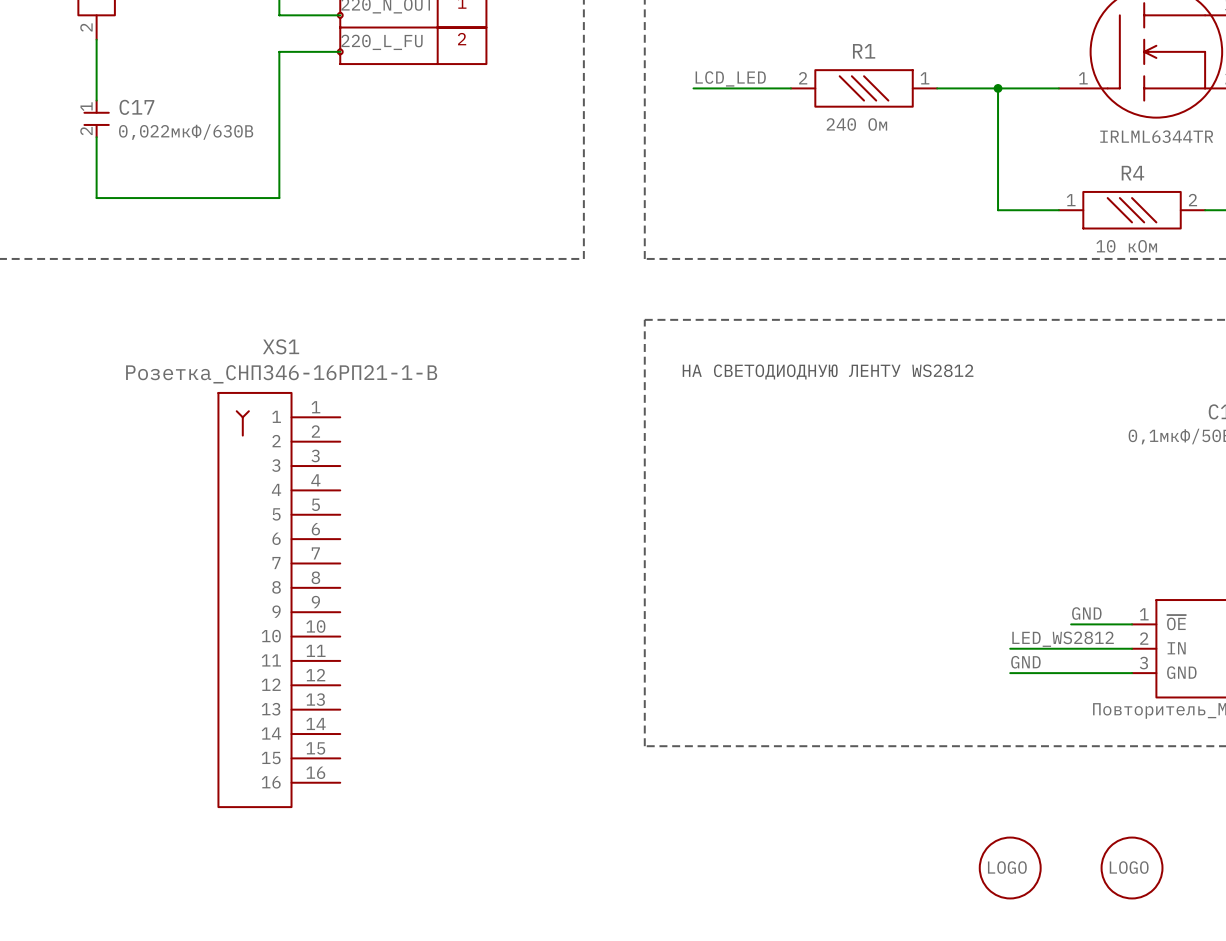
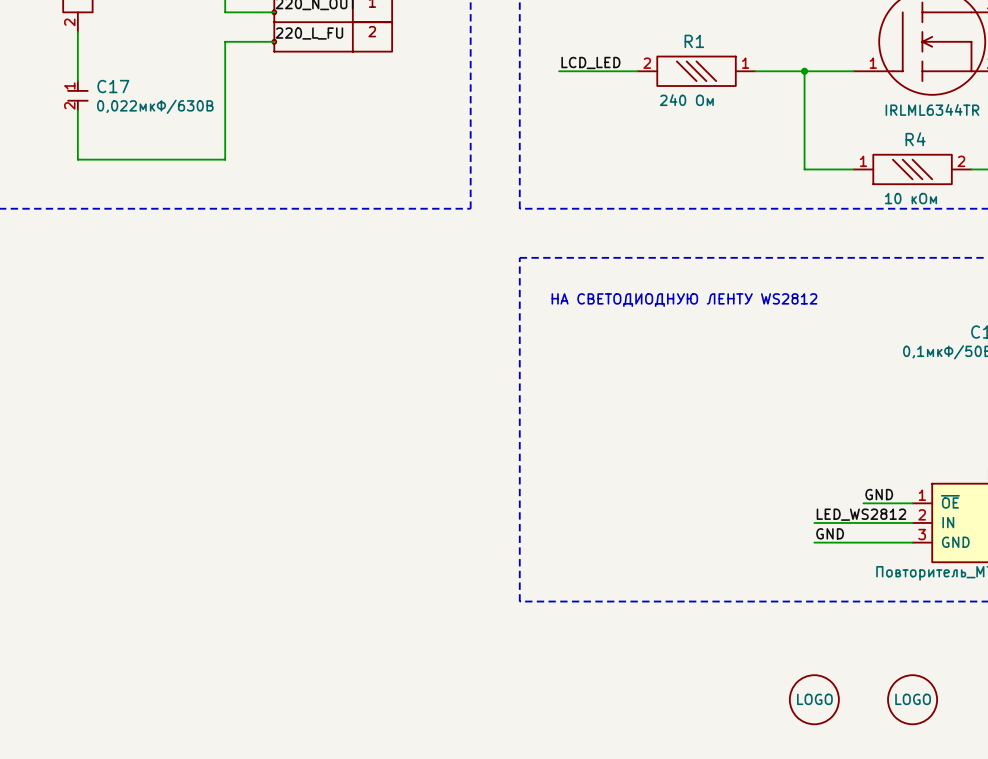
XS1: Розетка_СНП346-16РП21-1-В (279, 600) -> none

